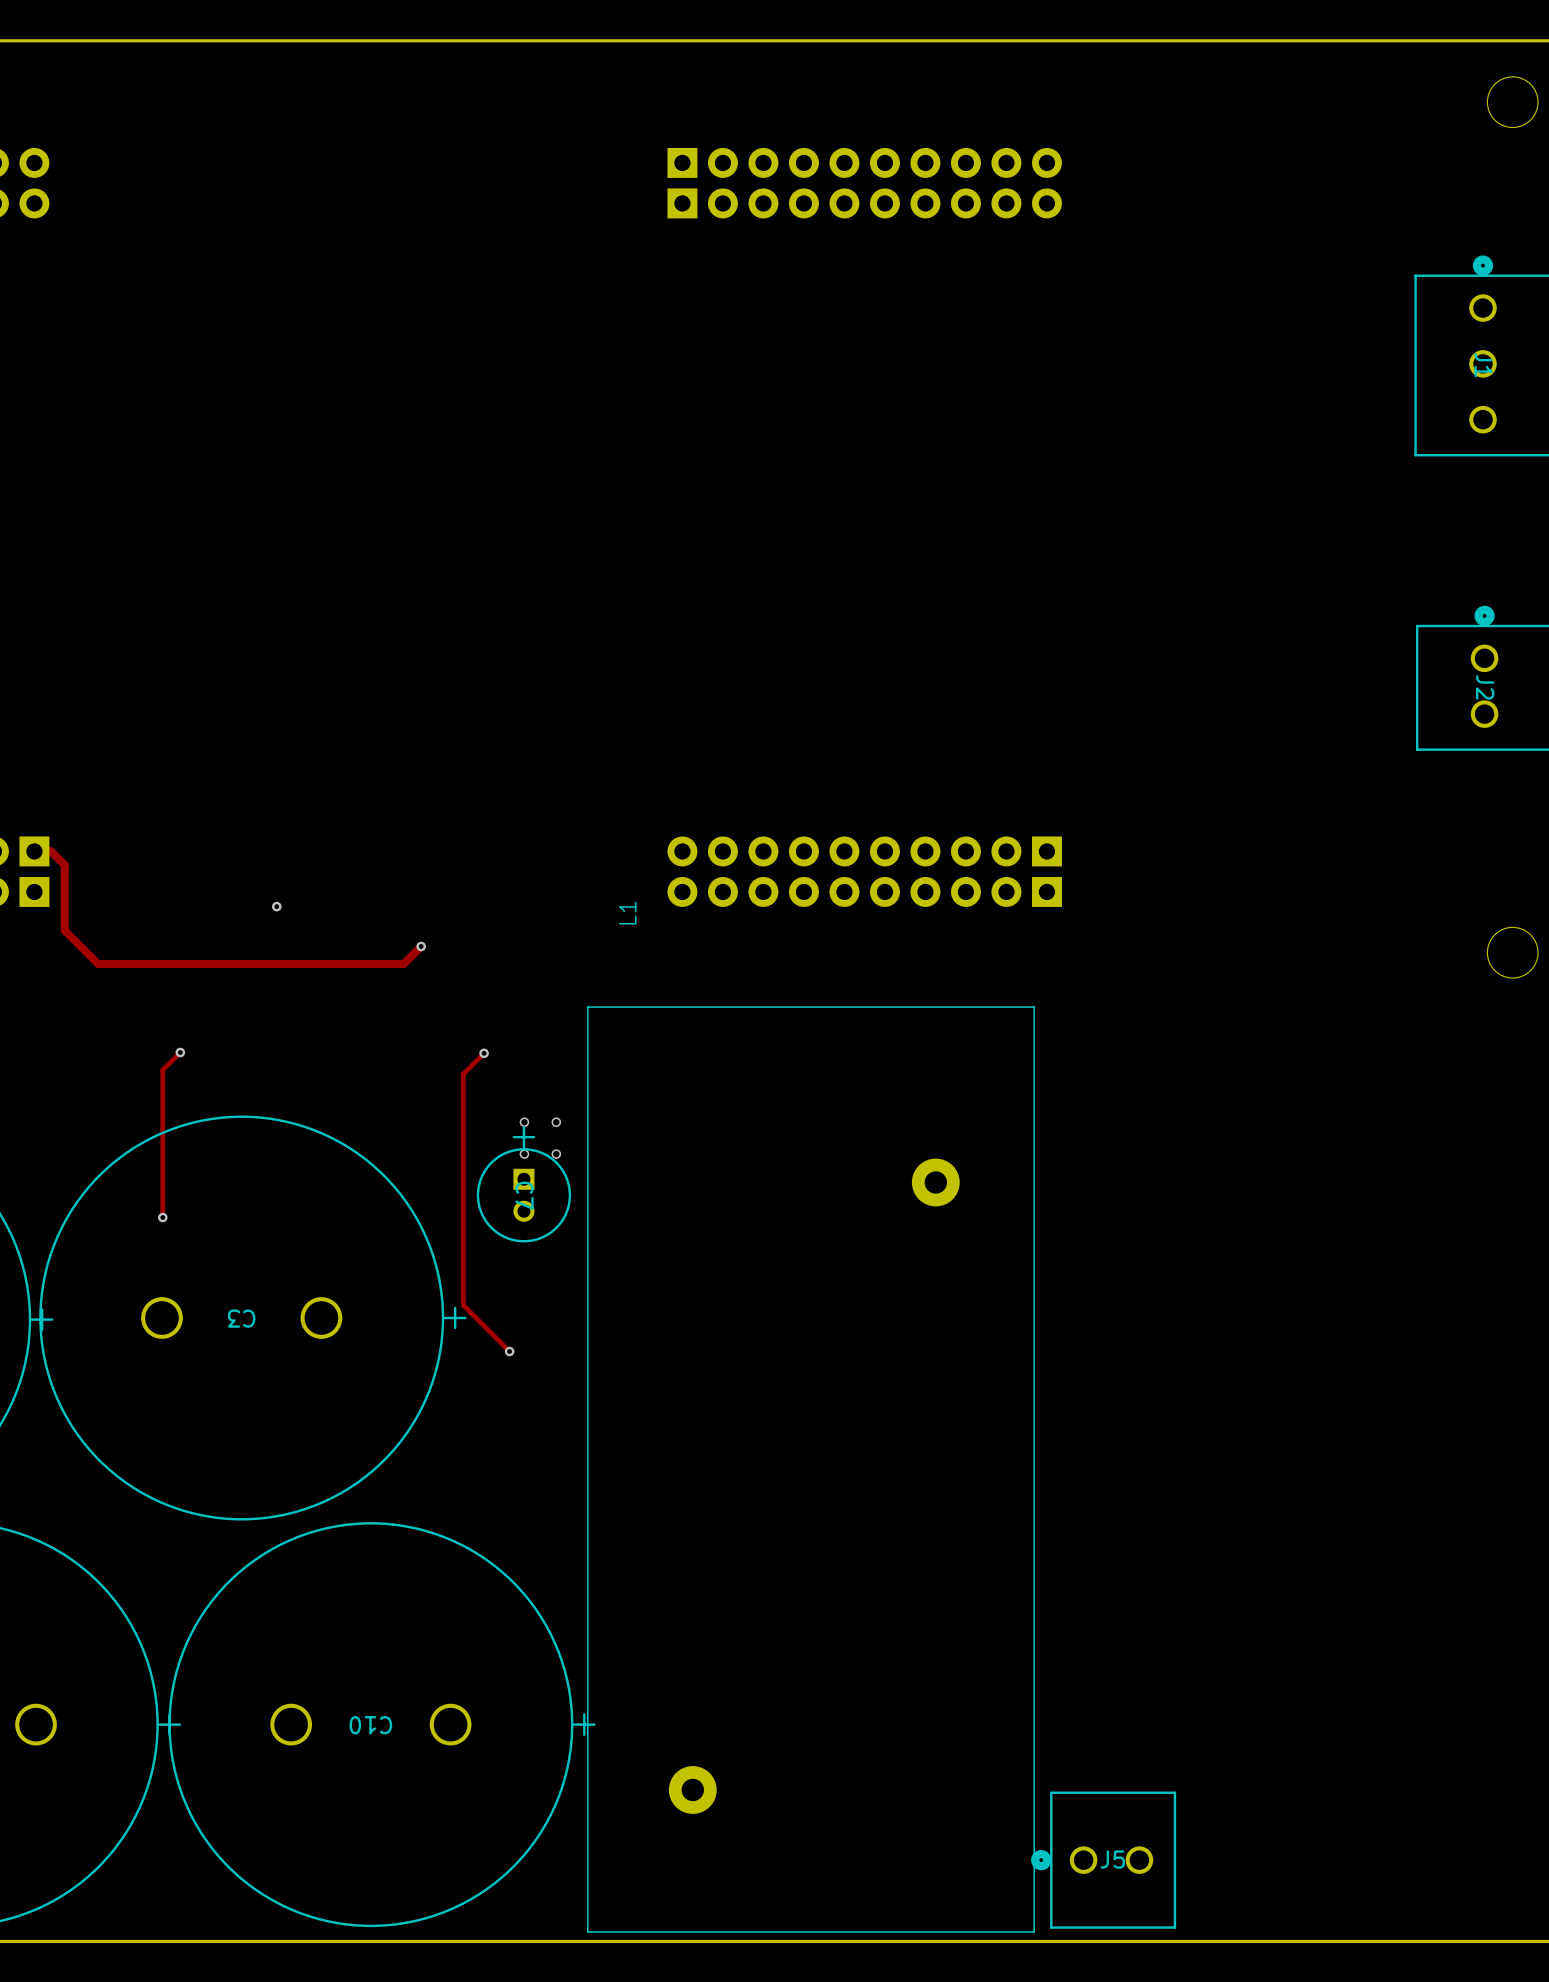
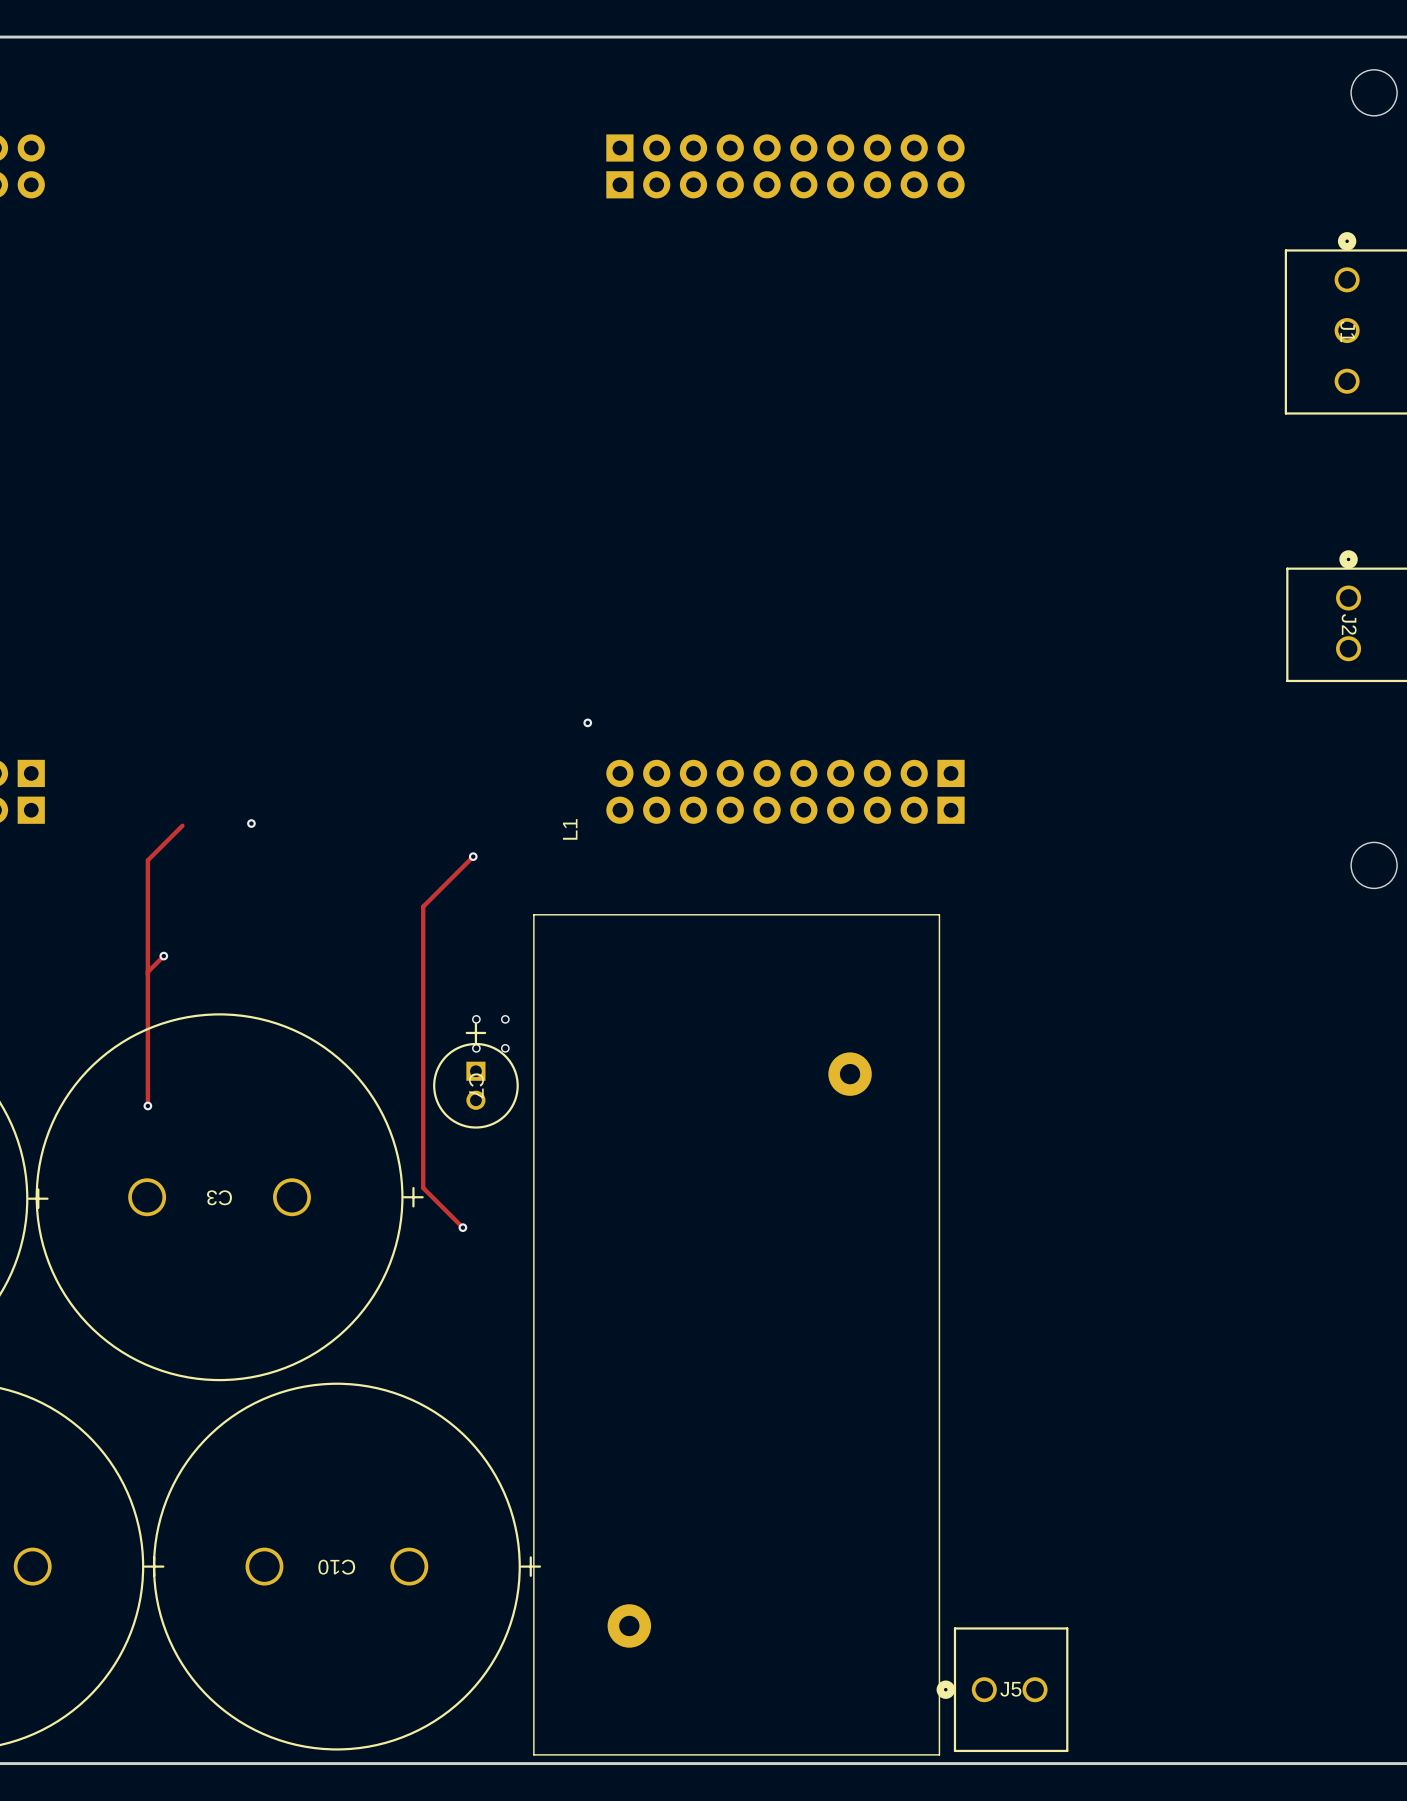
via: none -> (587, 722)
track: (34, 851) (51, 851) (64, 865) (64, 930) (98, 964) (403, 964) (421, 946) -> none
track: none -> (182, 825) (147, 860) (147, 972)
via: none -> (473, 856)
via: (421, 946) -> none
track: (484, 1053) (463, 1074) (463, 1305) (465, 1307) -> (473, 856) (423, 906) (423, 1187)
via: (484, 1053) -> none

